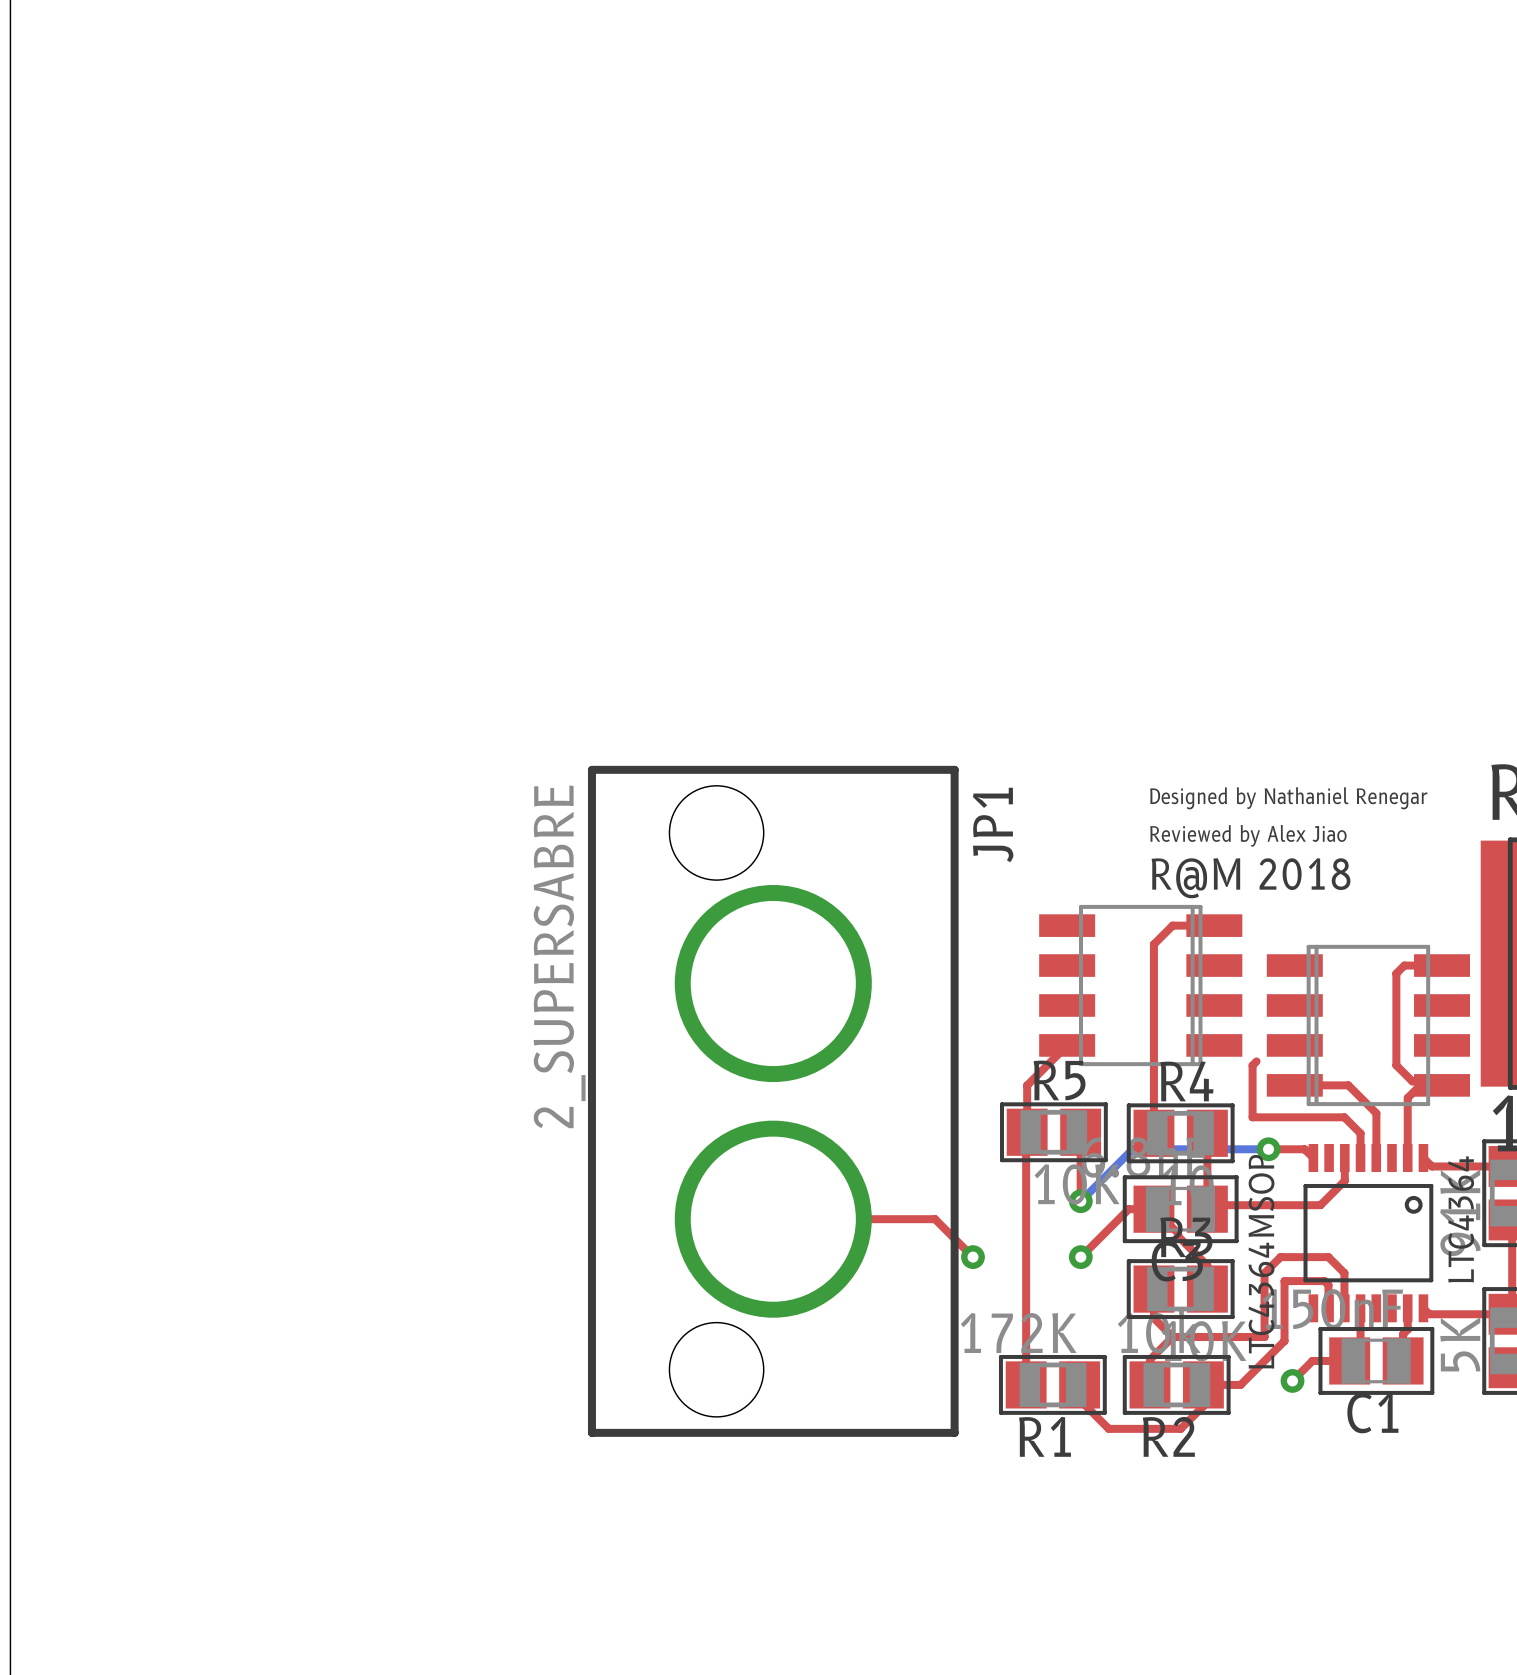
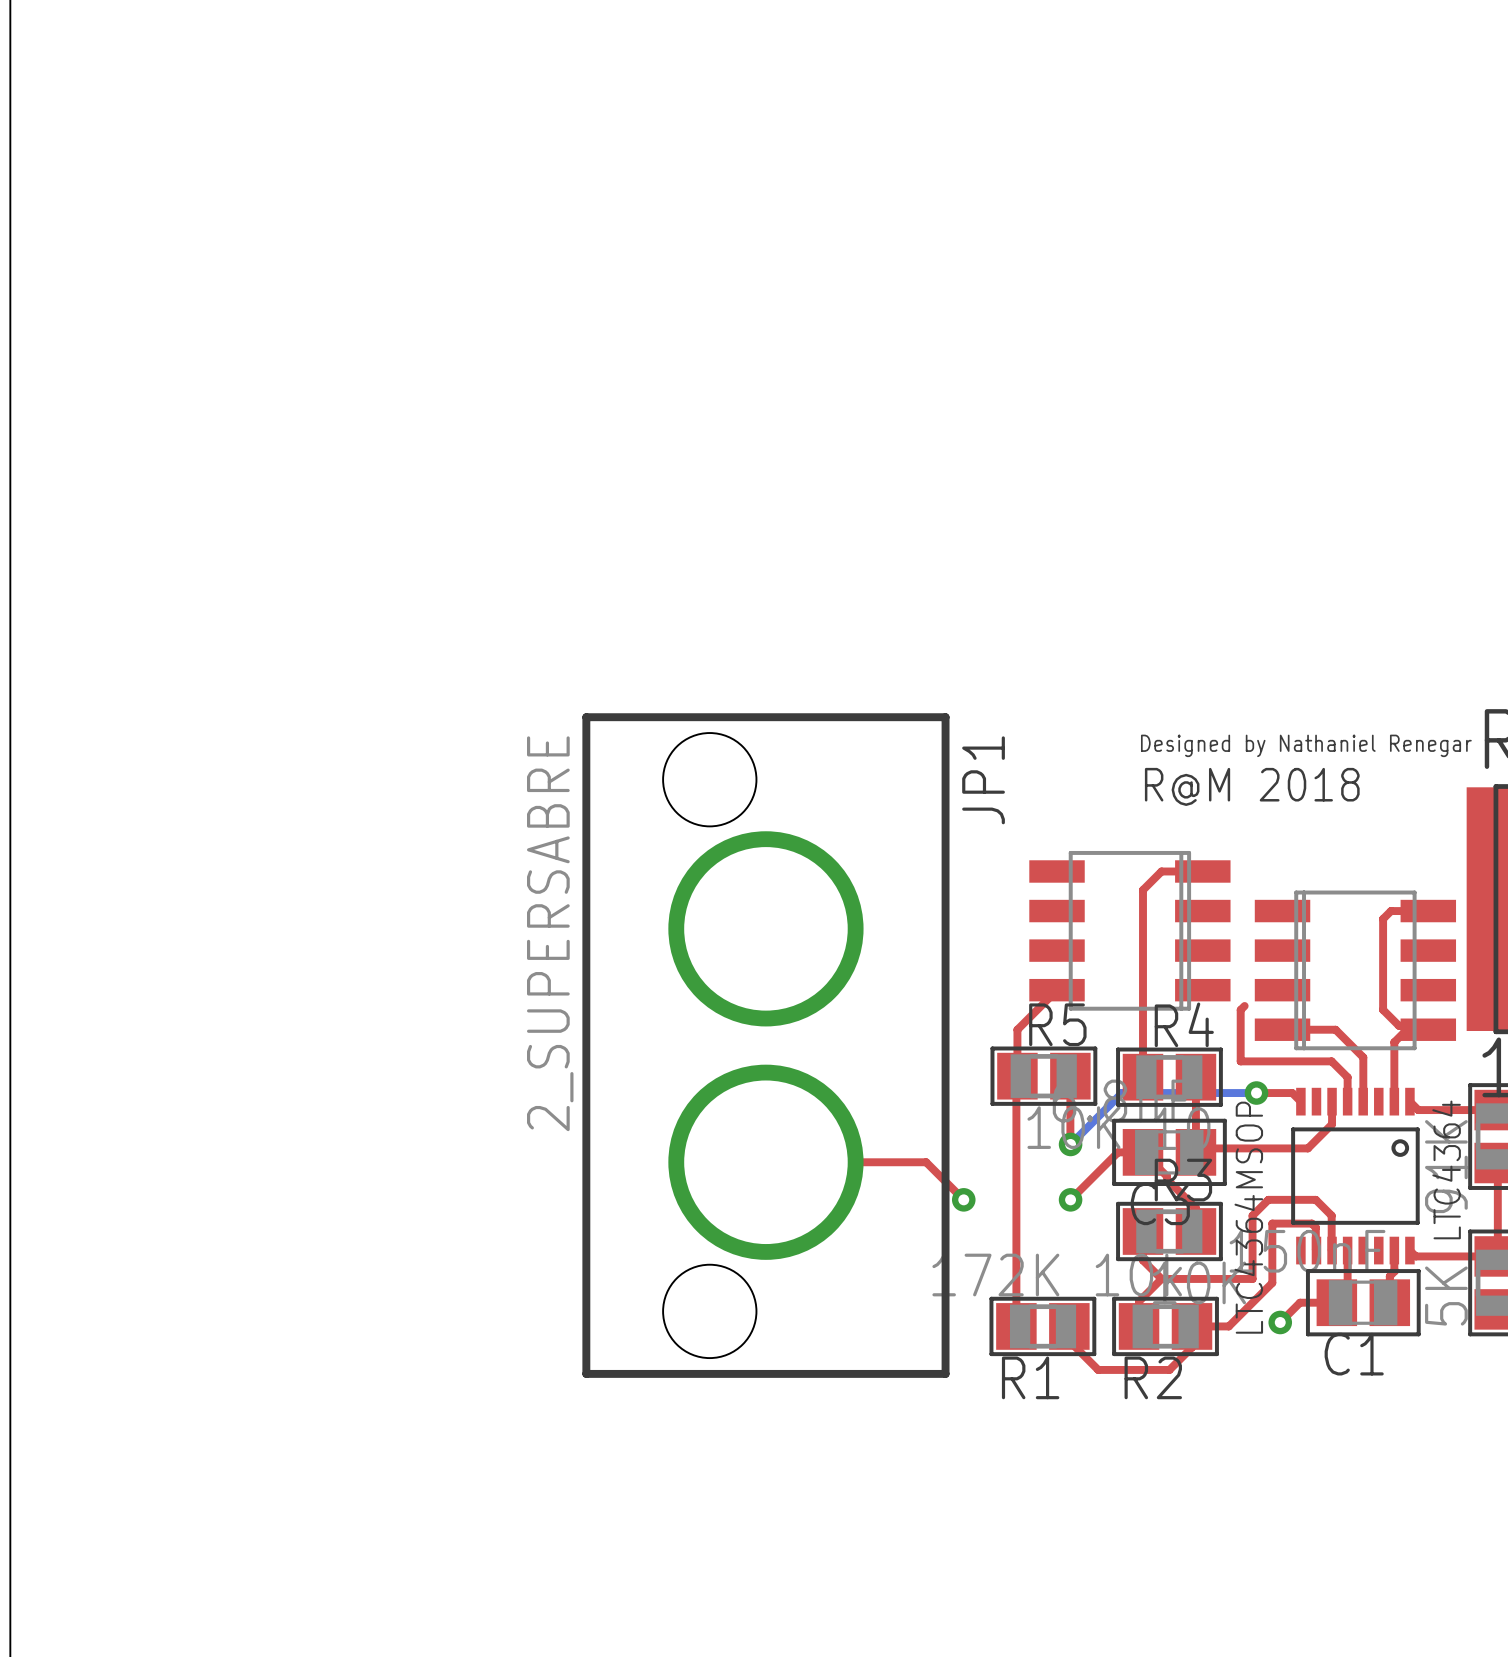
text: Reviewed by Alex Jiao (1248, 835) -> none
text position: R@M 2018 (1251, 878) -> R@M 2018 (1252, 786)

